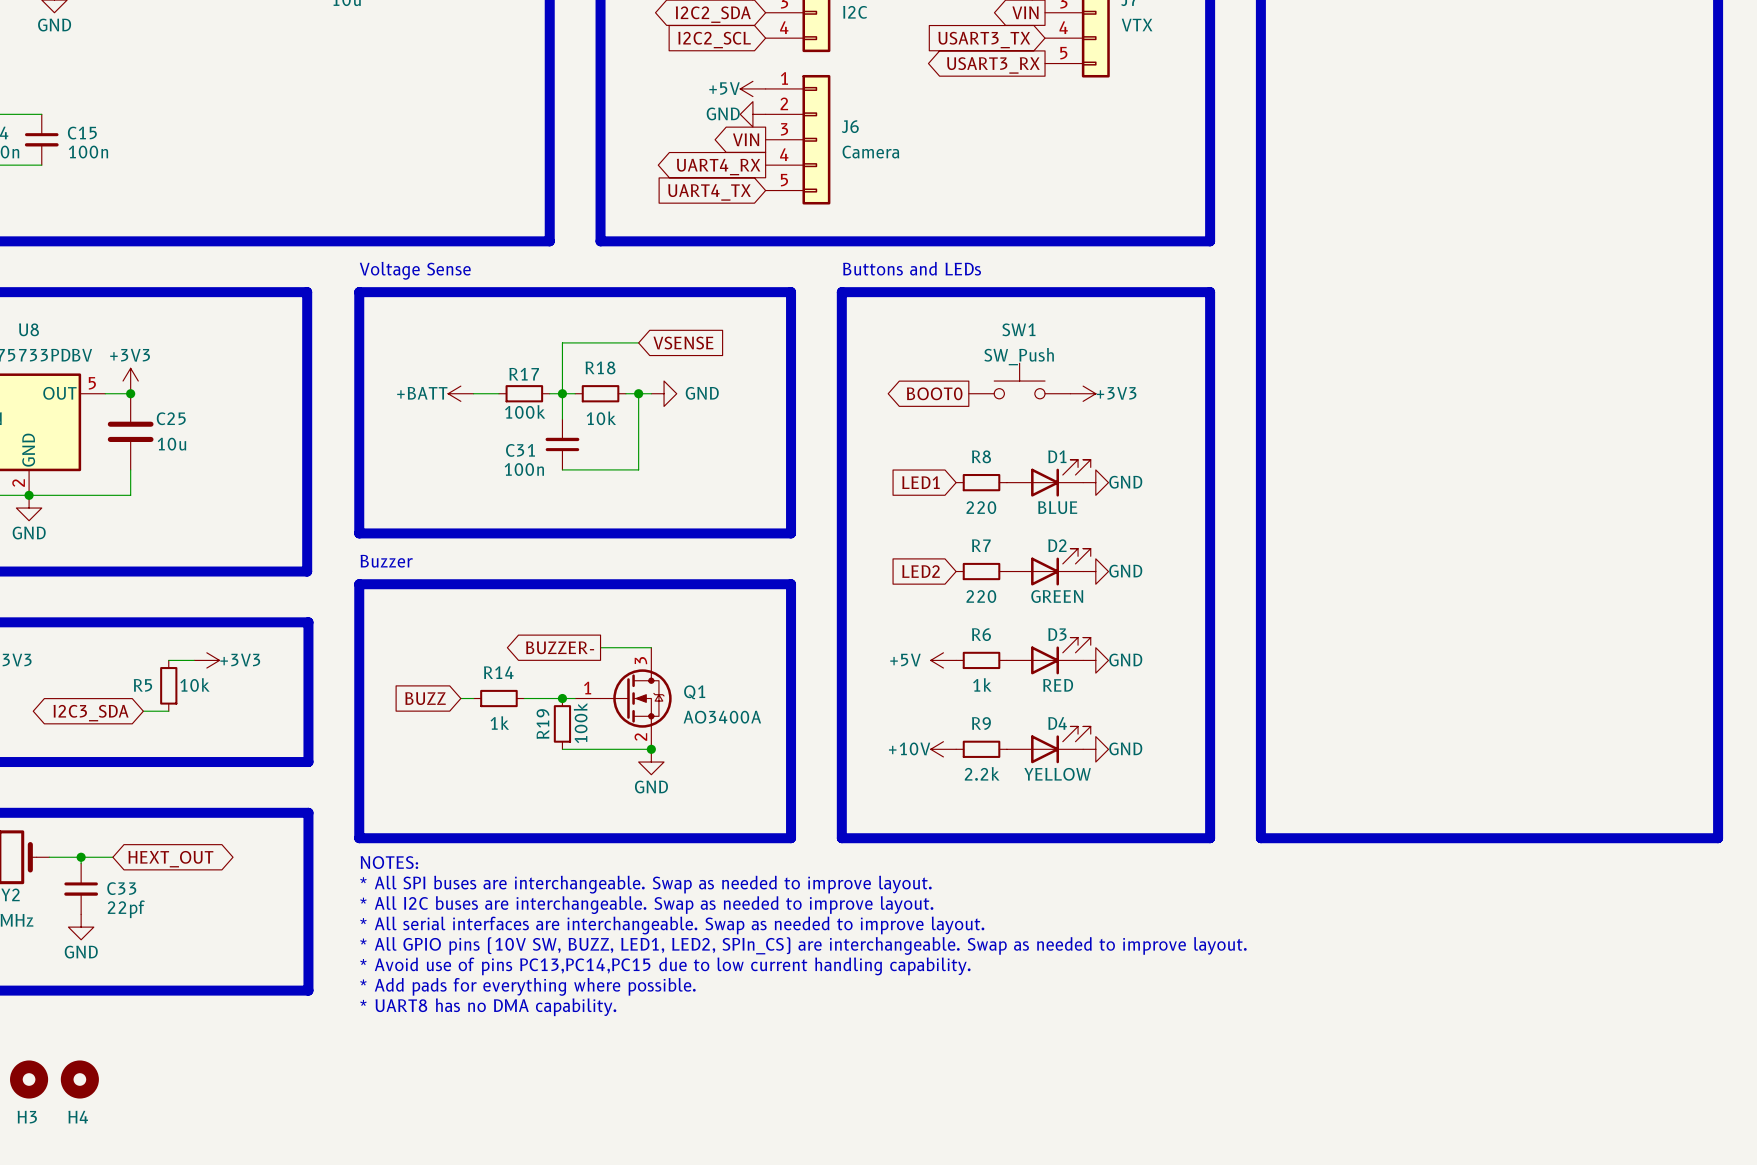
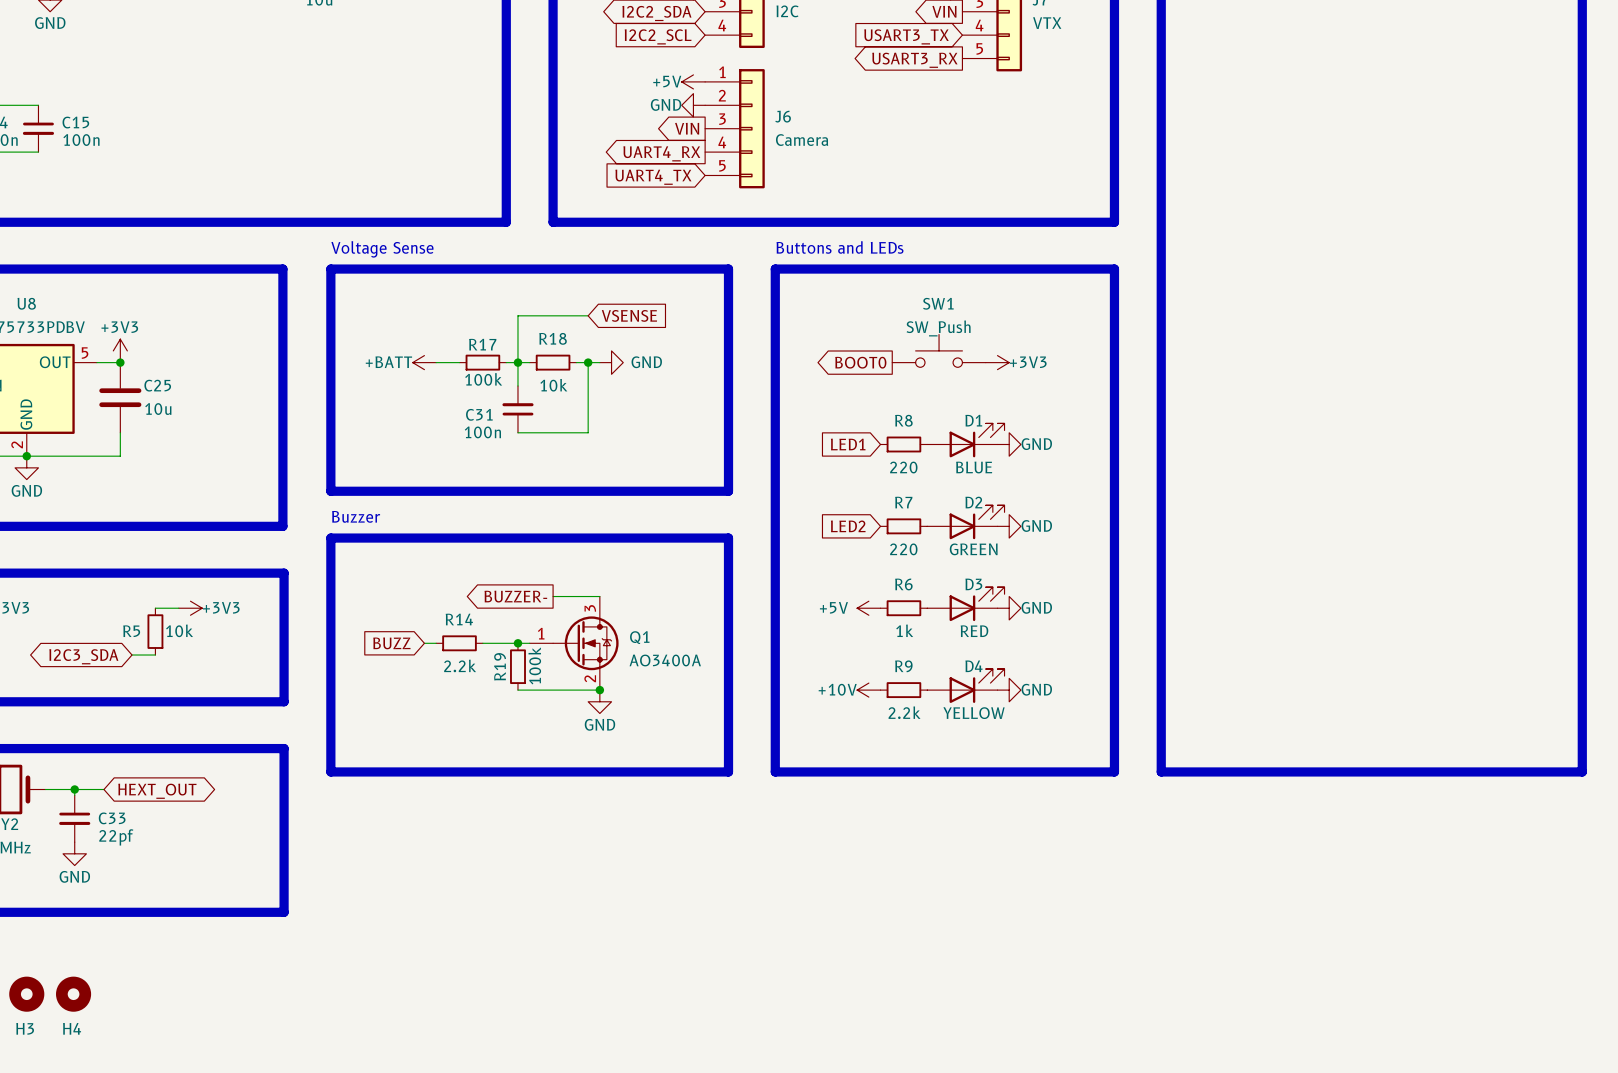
R14 value: 1k (499, 723) -> 2.2k (460, 665)
text: NOTES: (389, 862) -> none
text: * All SPI buses are interchangeable. Swap as needed to improve layout. (646, 884) -> none
text: * All I2C buses are interchangeable. Swap as needed to improve layout. (646, 905) -> none
text: * All serial interfaces are interchangeable. Swap as needed to improve layout. (672, 925) -> none
text: * All GPIO pins (10V SW, BUZZ, LED1, LED2, SPIn_CS) are interchangeable. Swap as needed to improve layout. (803, 946) -> none
text: * Avoid use of pins PC13,PC14,PC15 due to low current handling capability. (665, 966) -> none
text: * Add pads for everything where possible. (527, 986) -> none
text: * UART8 has no DMA capability. (488, 1007) -> none

